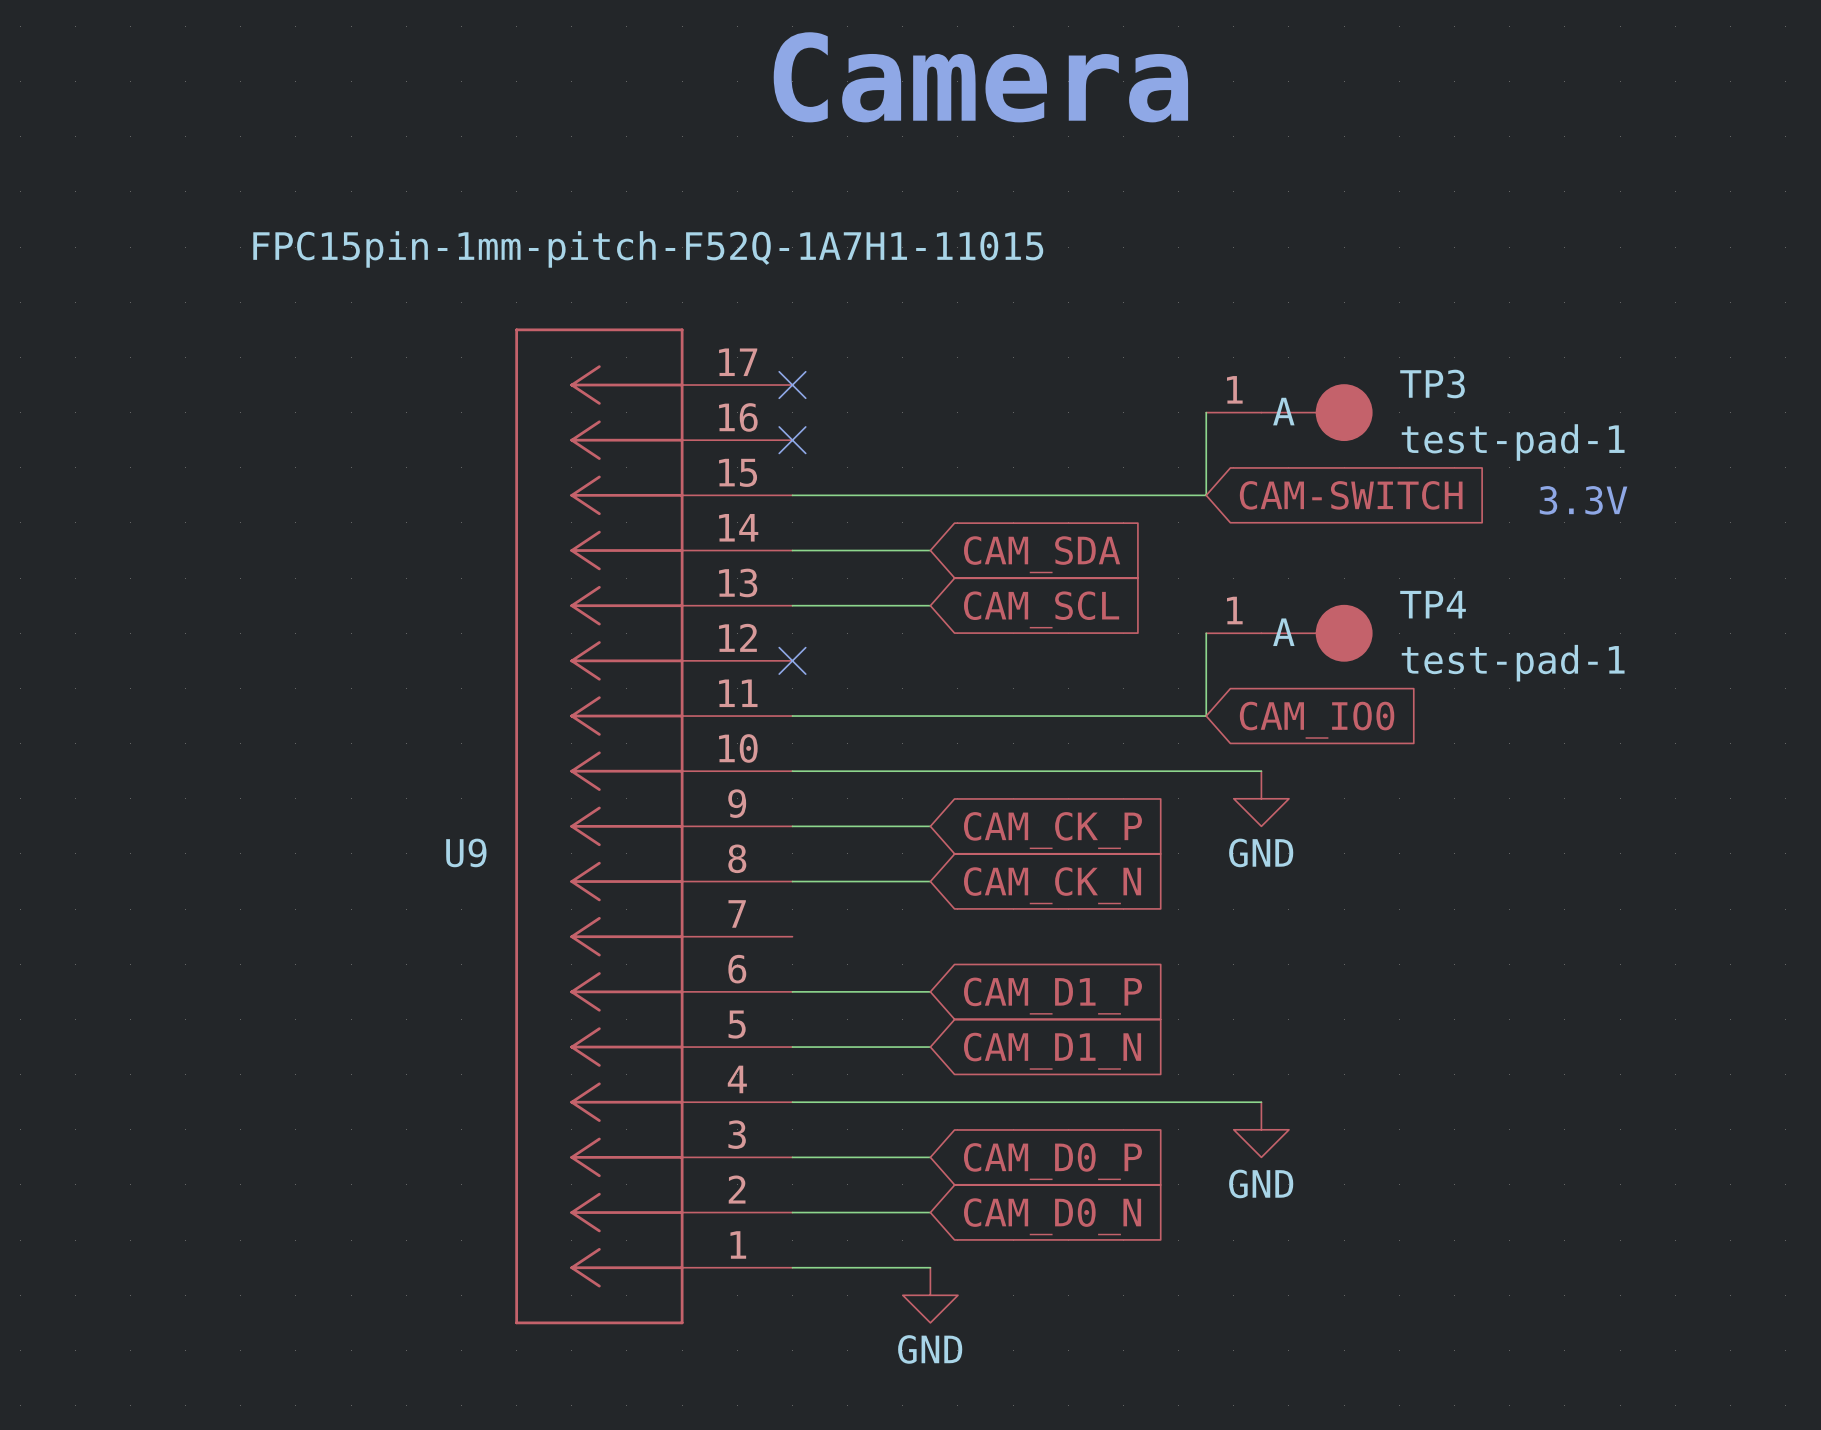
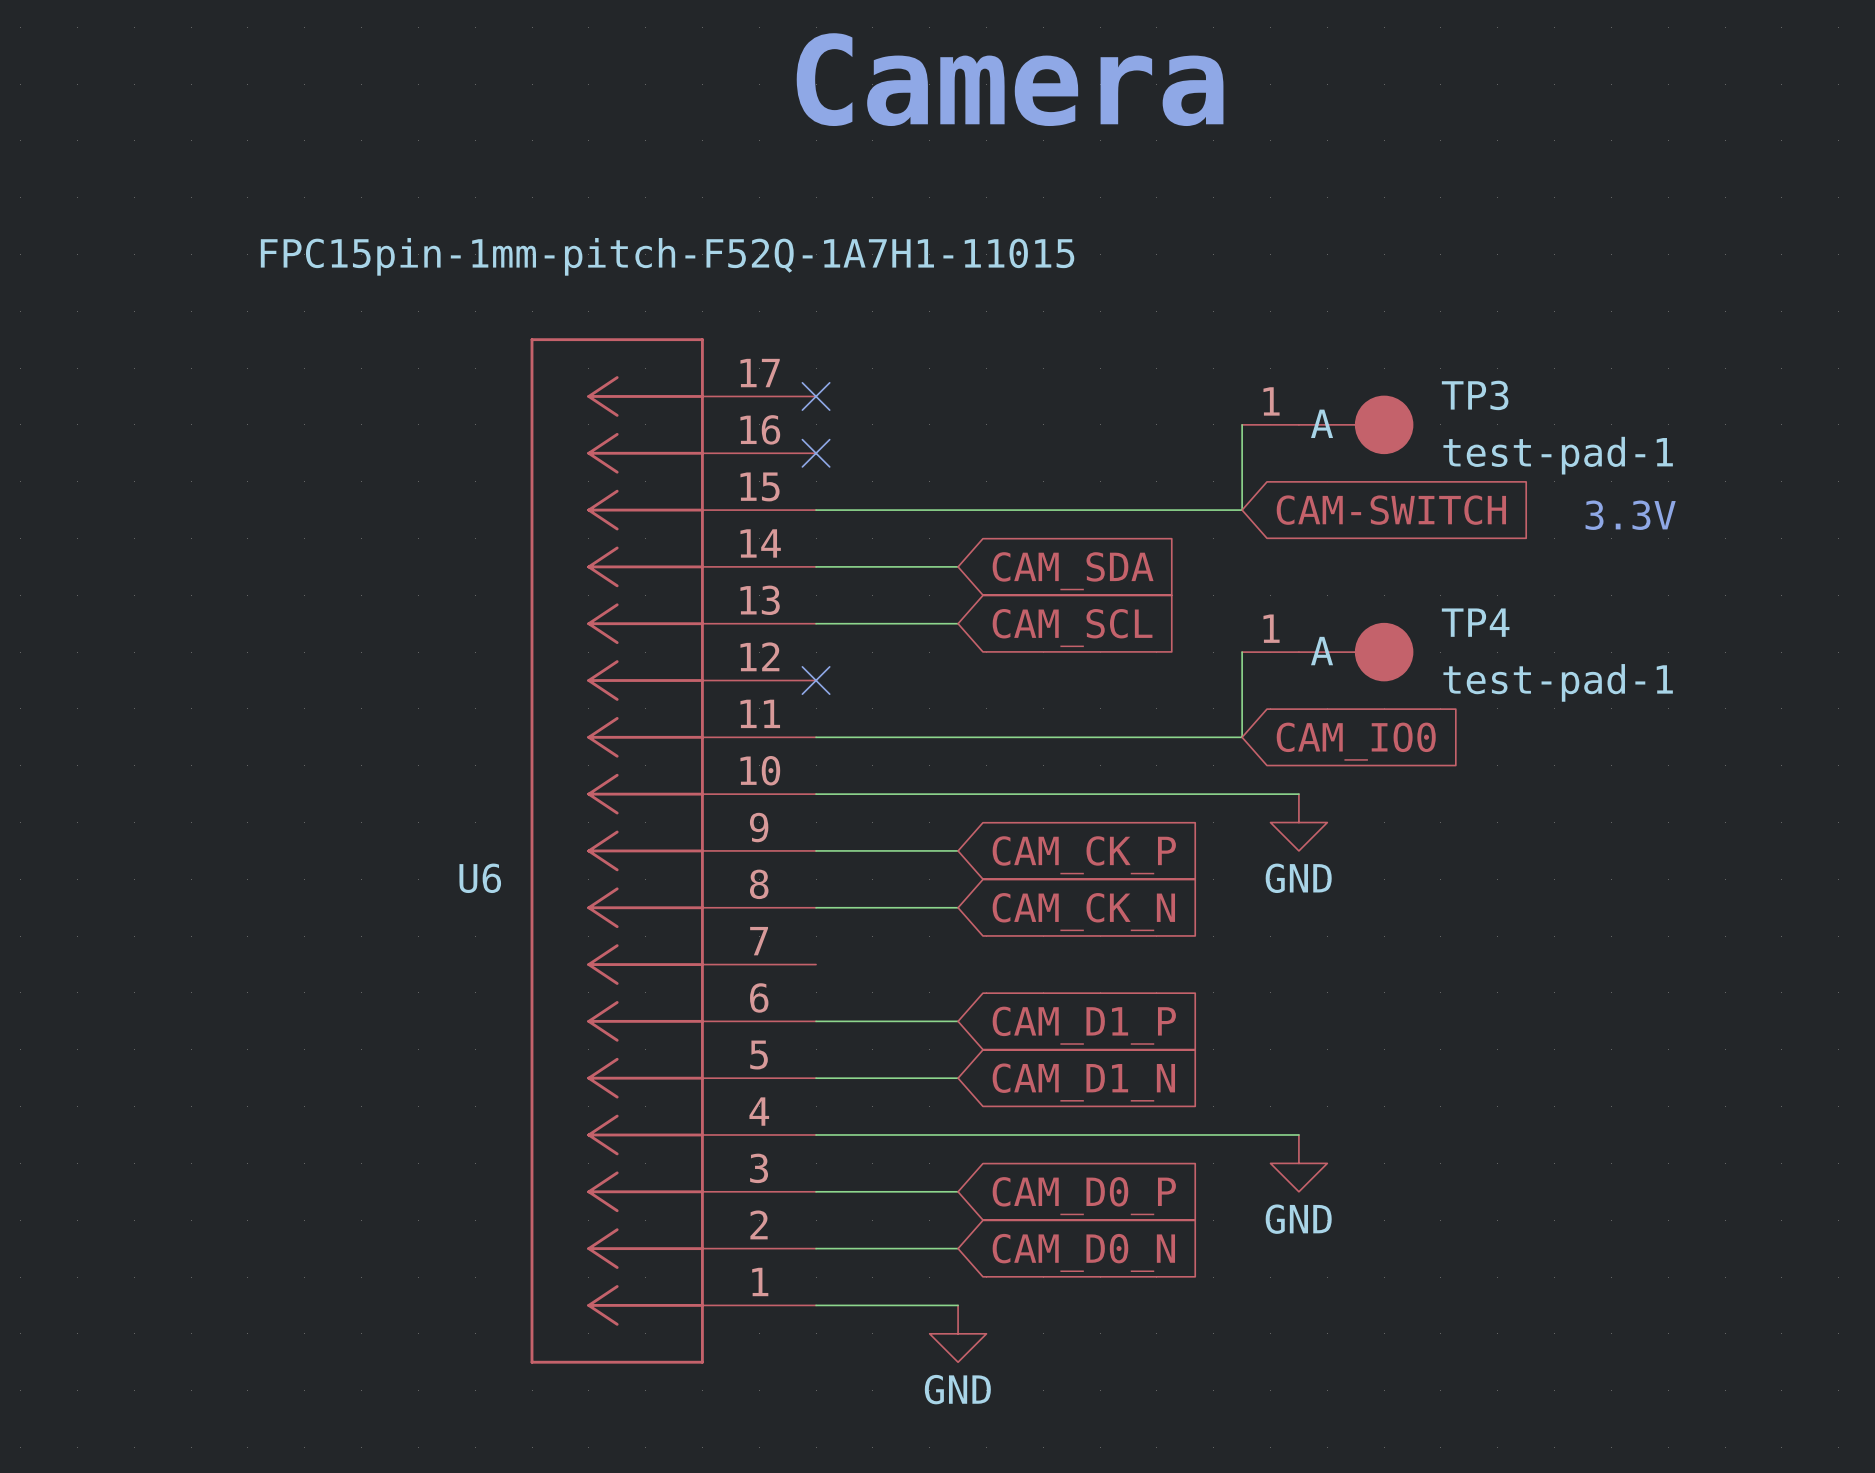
U9 name: U9 (466, 852) -> U6 (480, 878)

